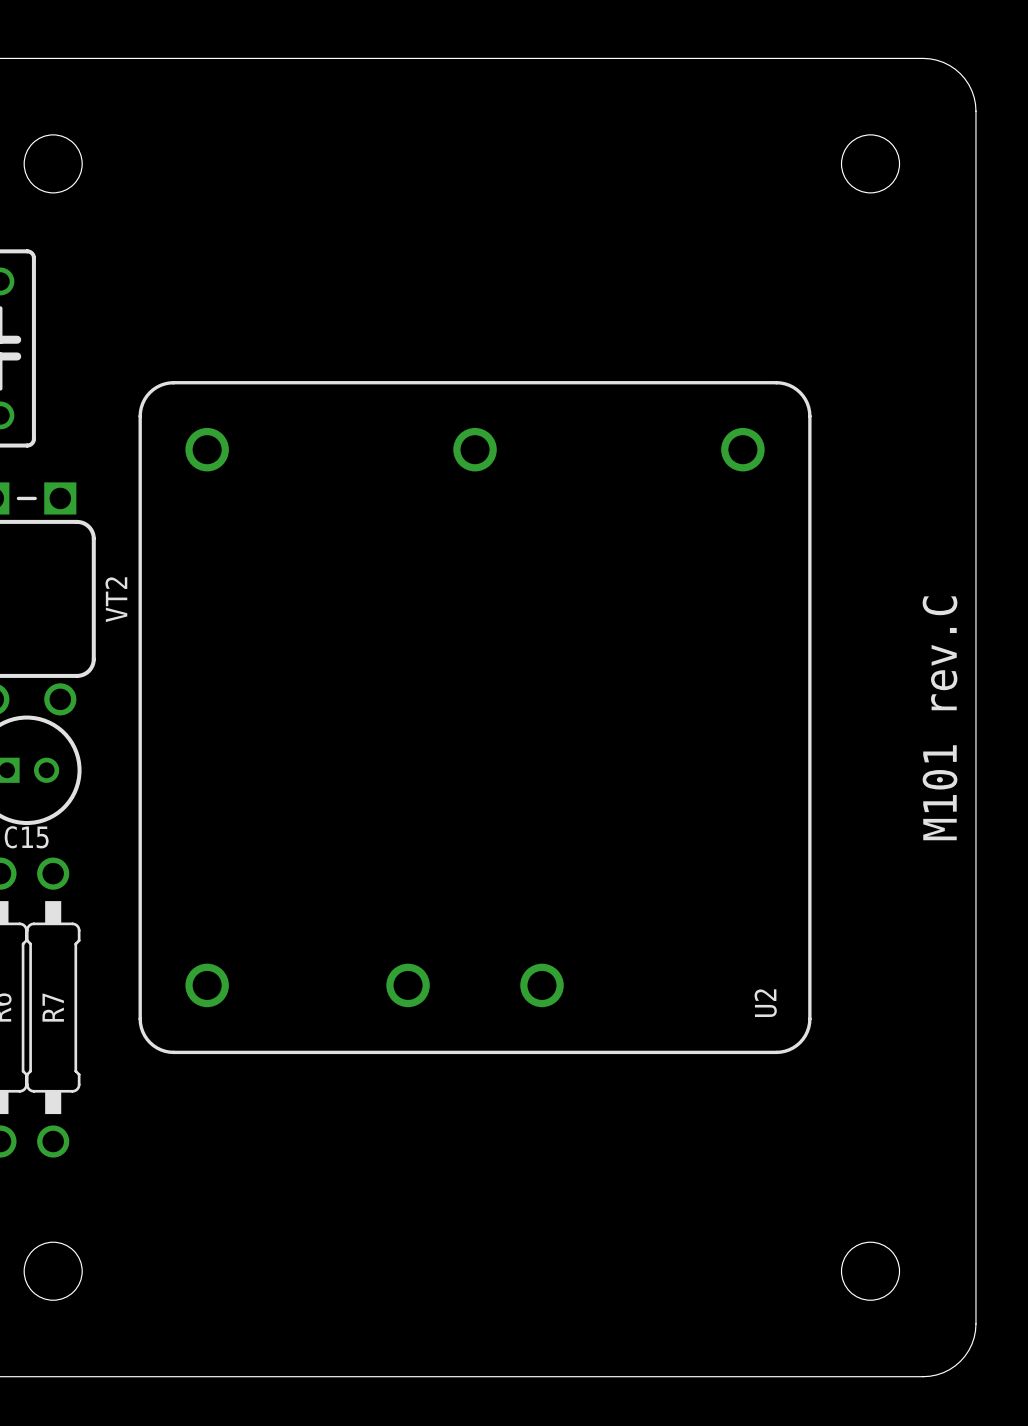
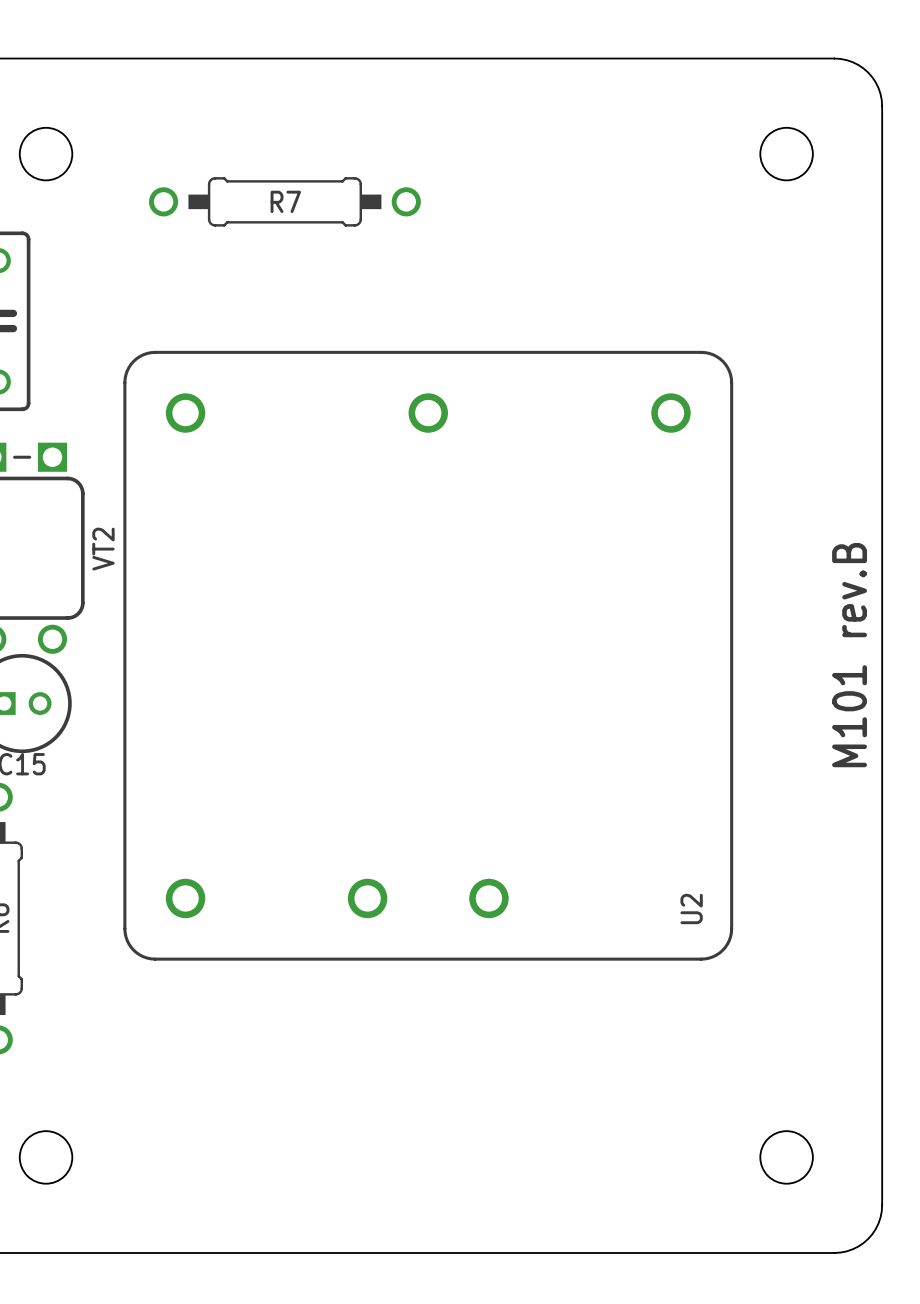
part value: M101 rev.C (940, 718) -> M101 rev.B (849, 655)
R7 rotation: 0° (53, 1007) -> 90° clockwise (284, 201)
R7 position: (53, 1007) -> (284, 201)

